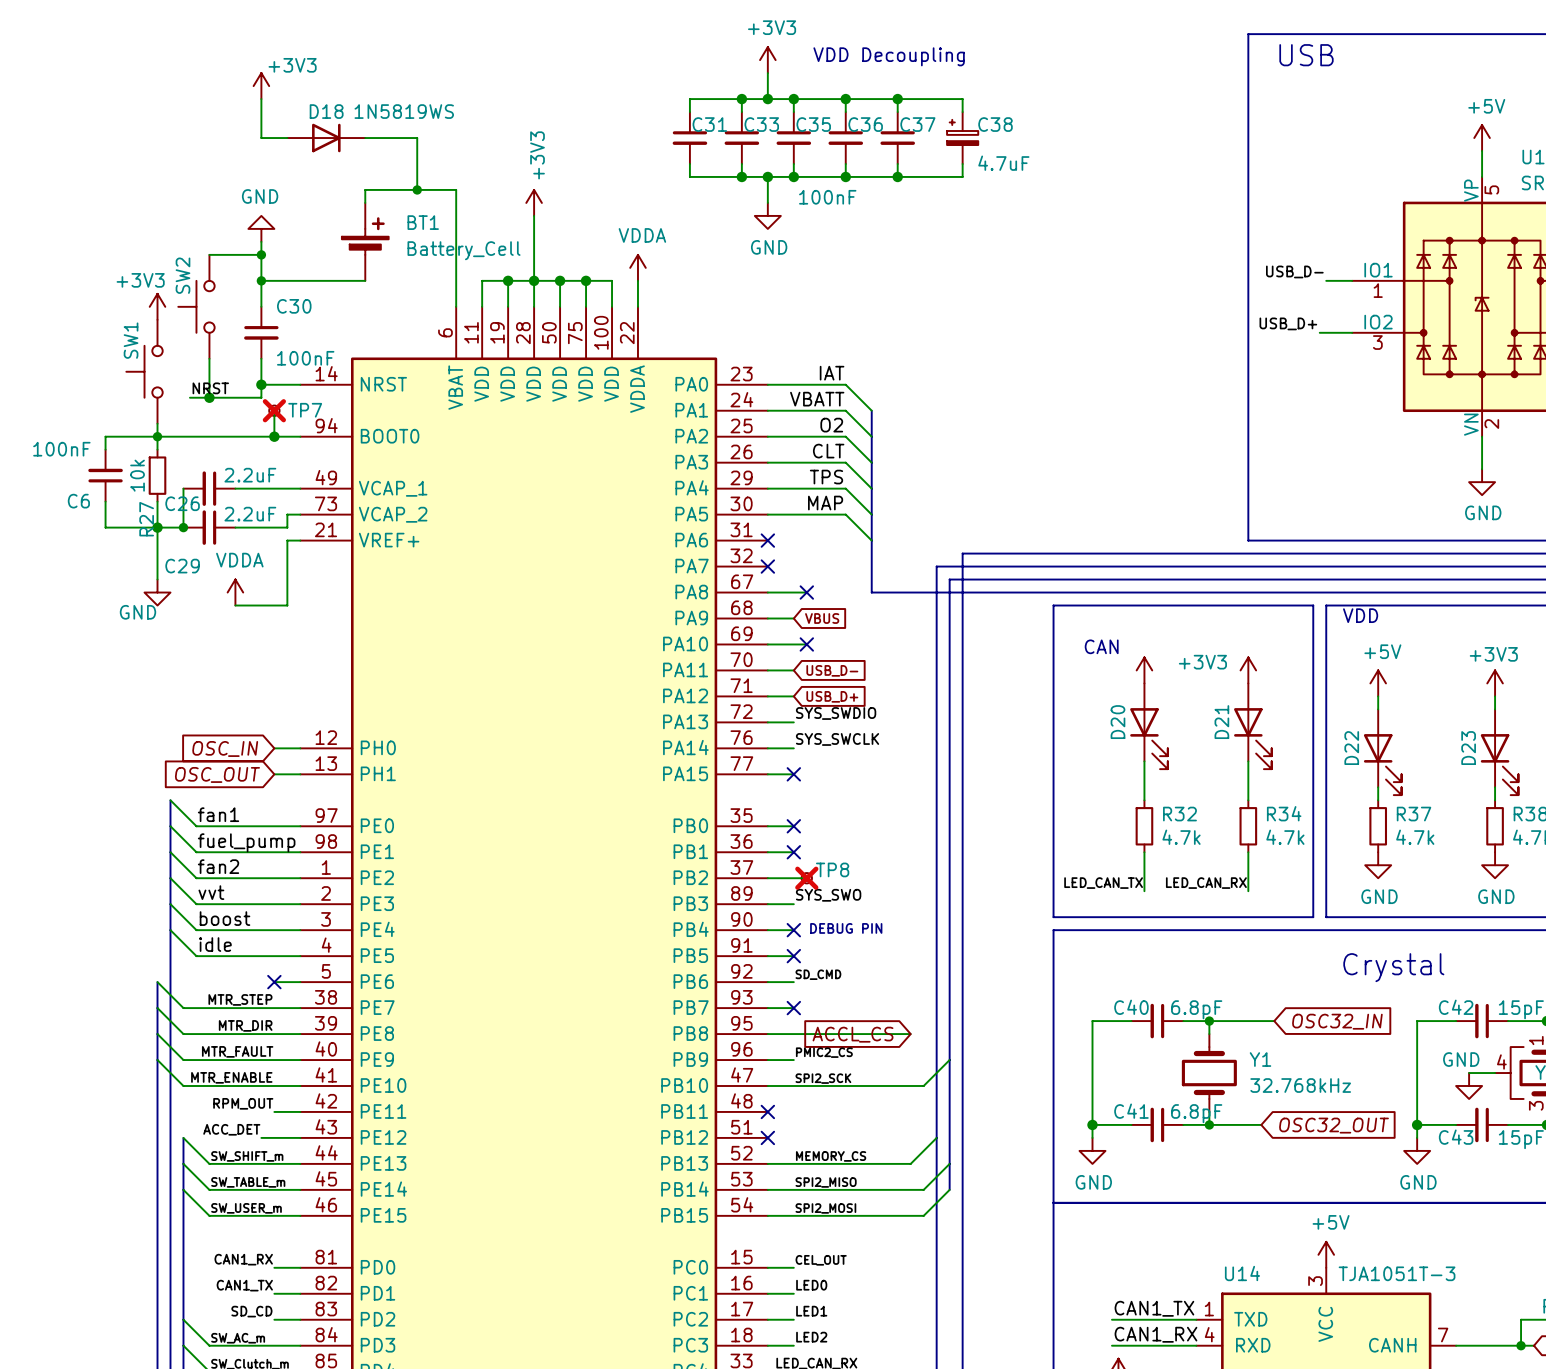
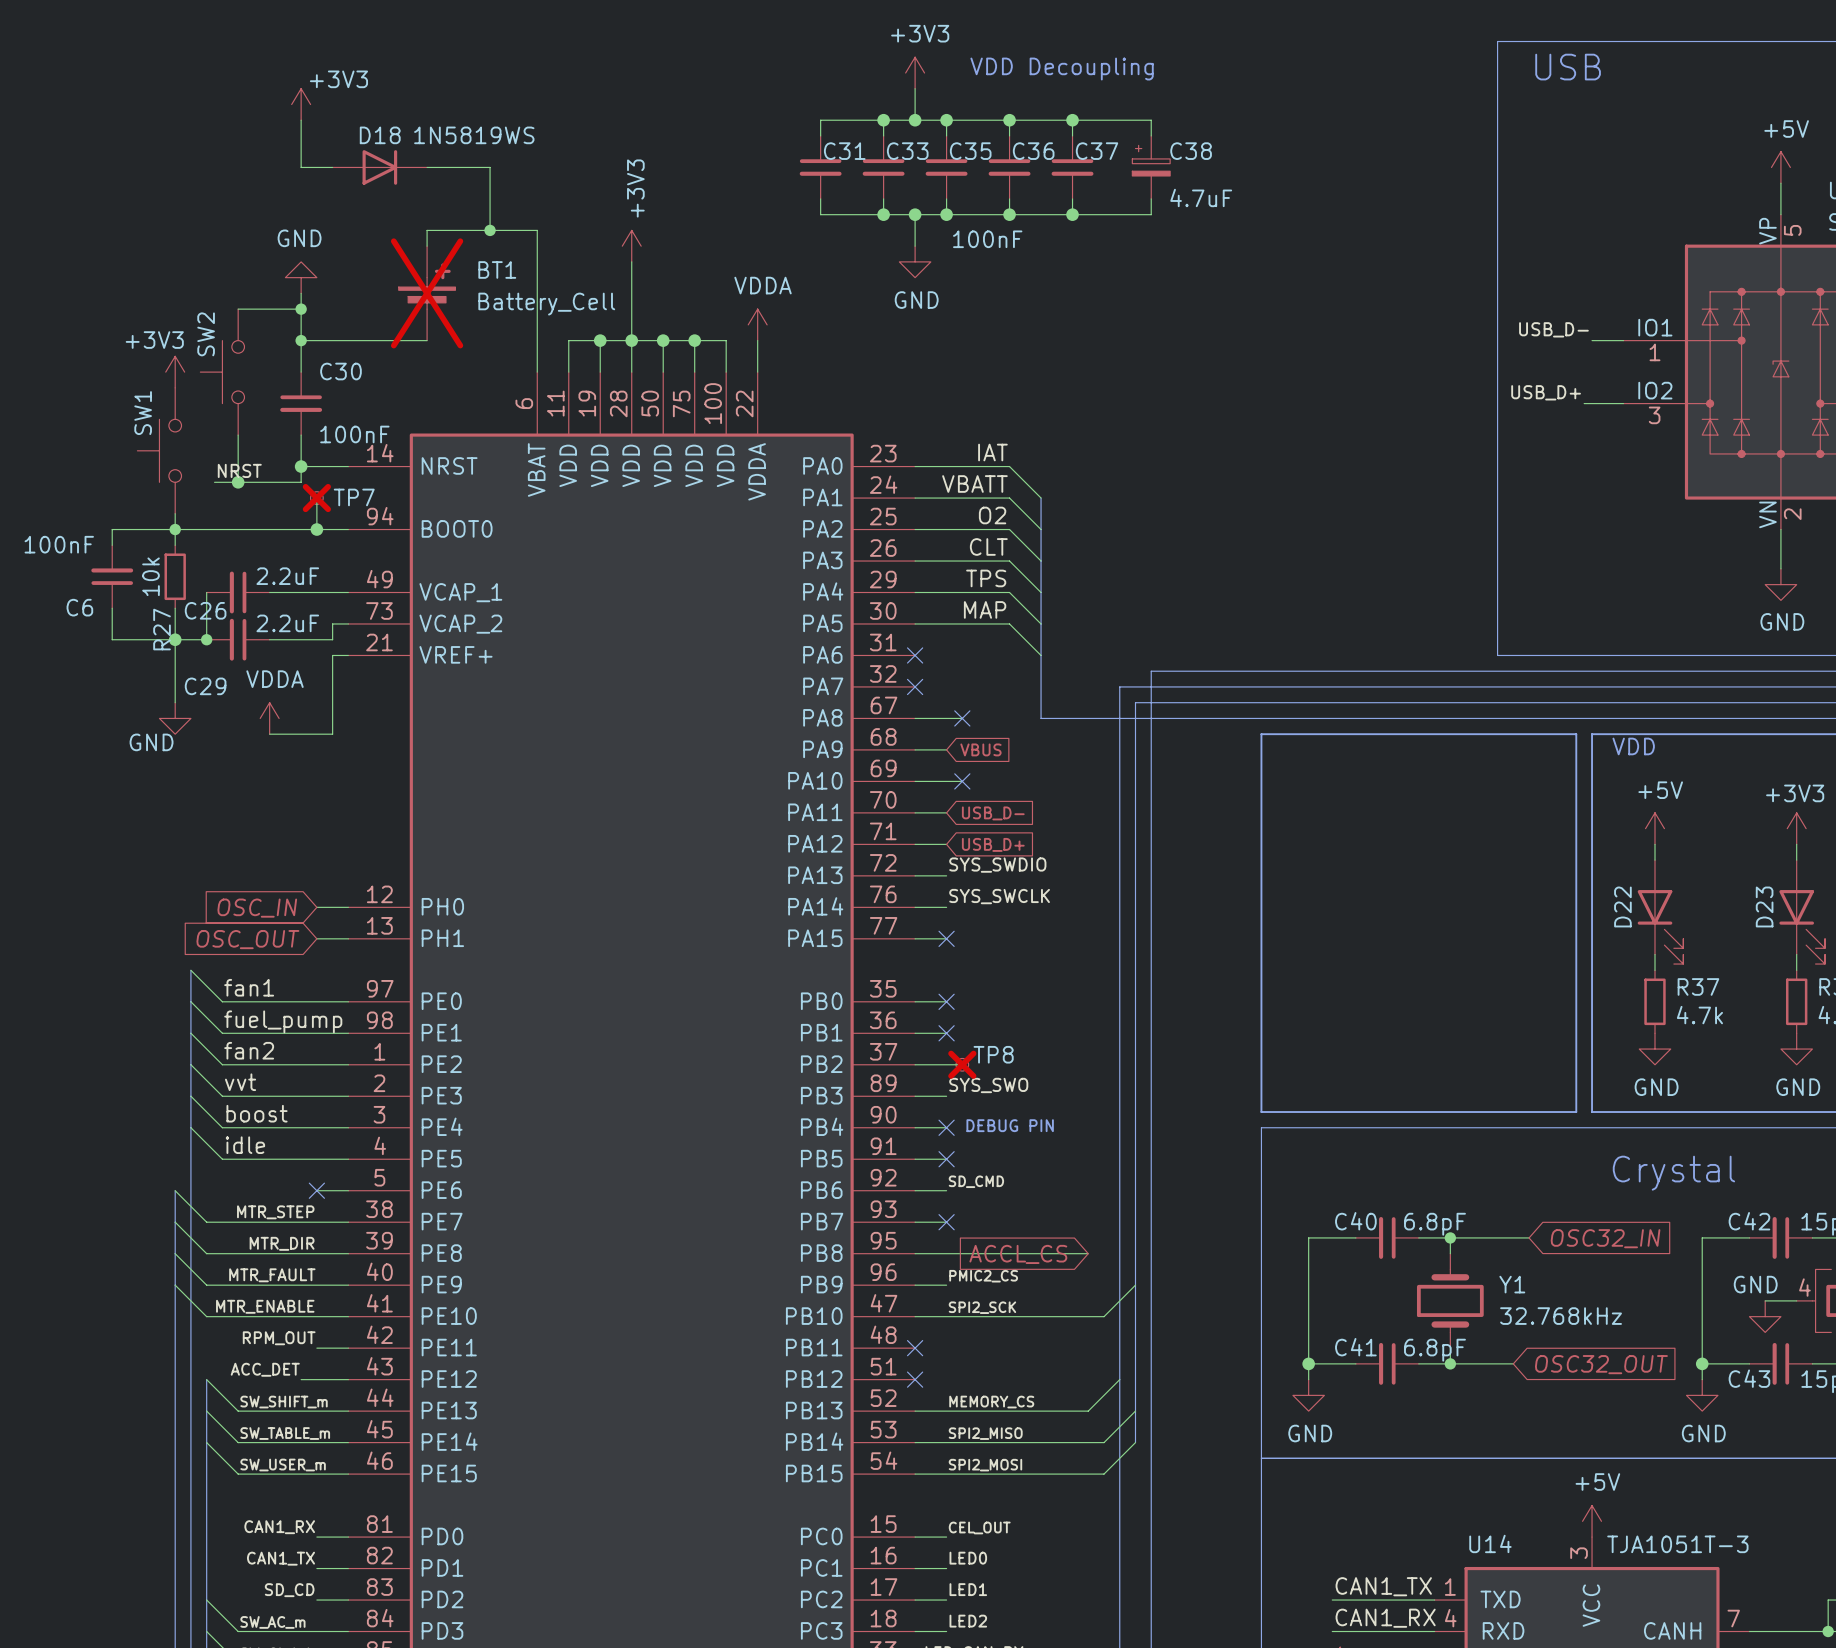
BT1 do-not-place cross: none -> (427, 293)
text: CAN (1101, 646) -> none
power symbol: +3V3 (1144, 670) -> none
power symbol: (1248, 670) -> none
D20: (1148, 726) -> none
D21: (1252, 726) -> none
wire: (1144, 761) (1144, 800) -> none
wire: (1248, 761) (1248, 800) -> none
R32: 4.7k (1144, 826) -> none
R34: 4.7k (1248, 826) -> none
wire: (1144, 852) (1144, 891) -> none
wire: (1248, 852) (1248, 891) -> none
label: LED_CAN_TX (1103, 883) -> none
label: LED_CAN_RX (1206, 883) -> none

